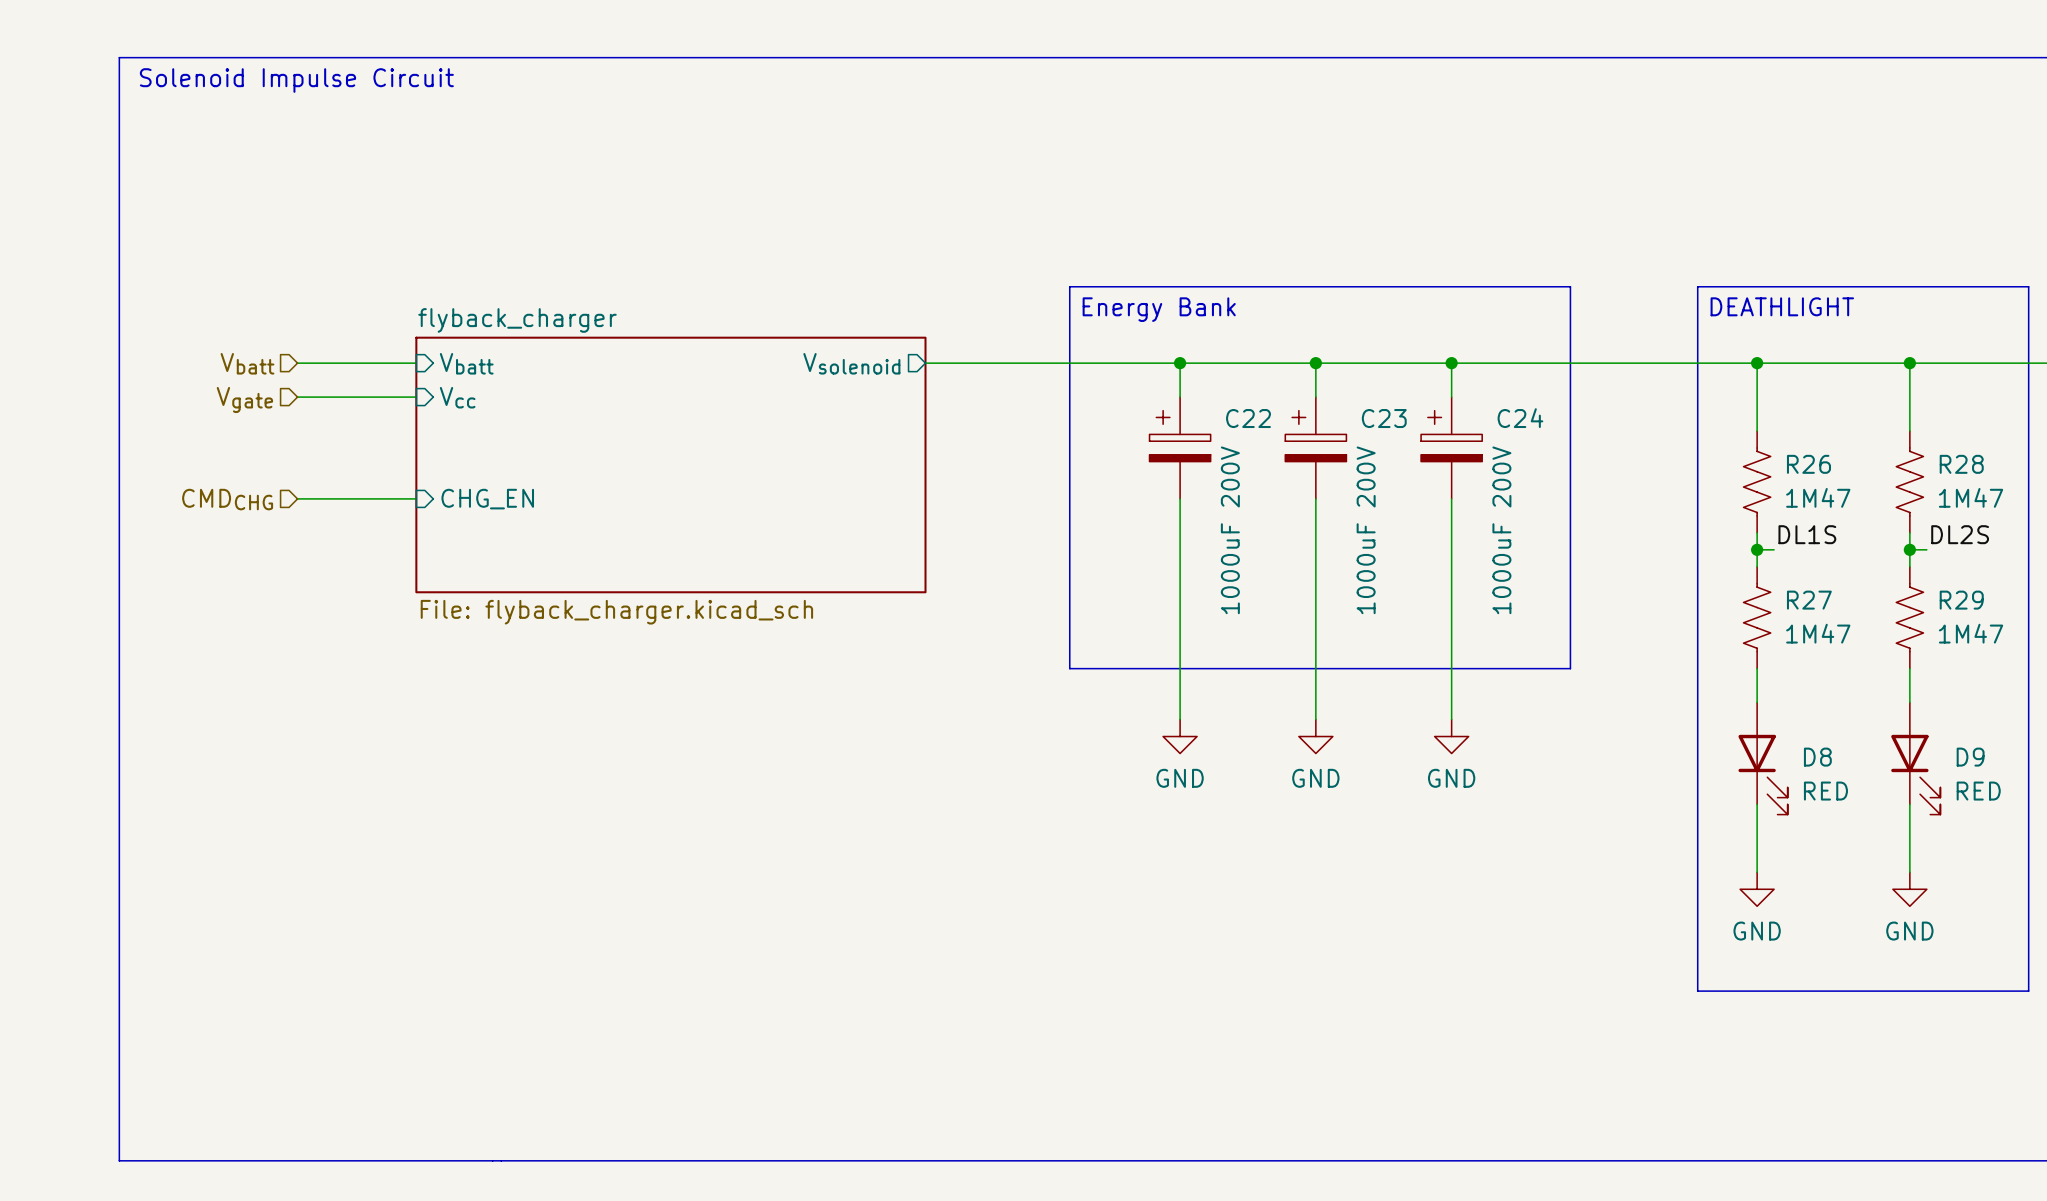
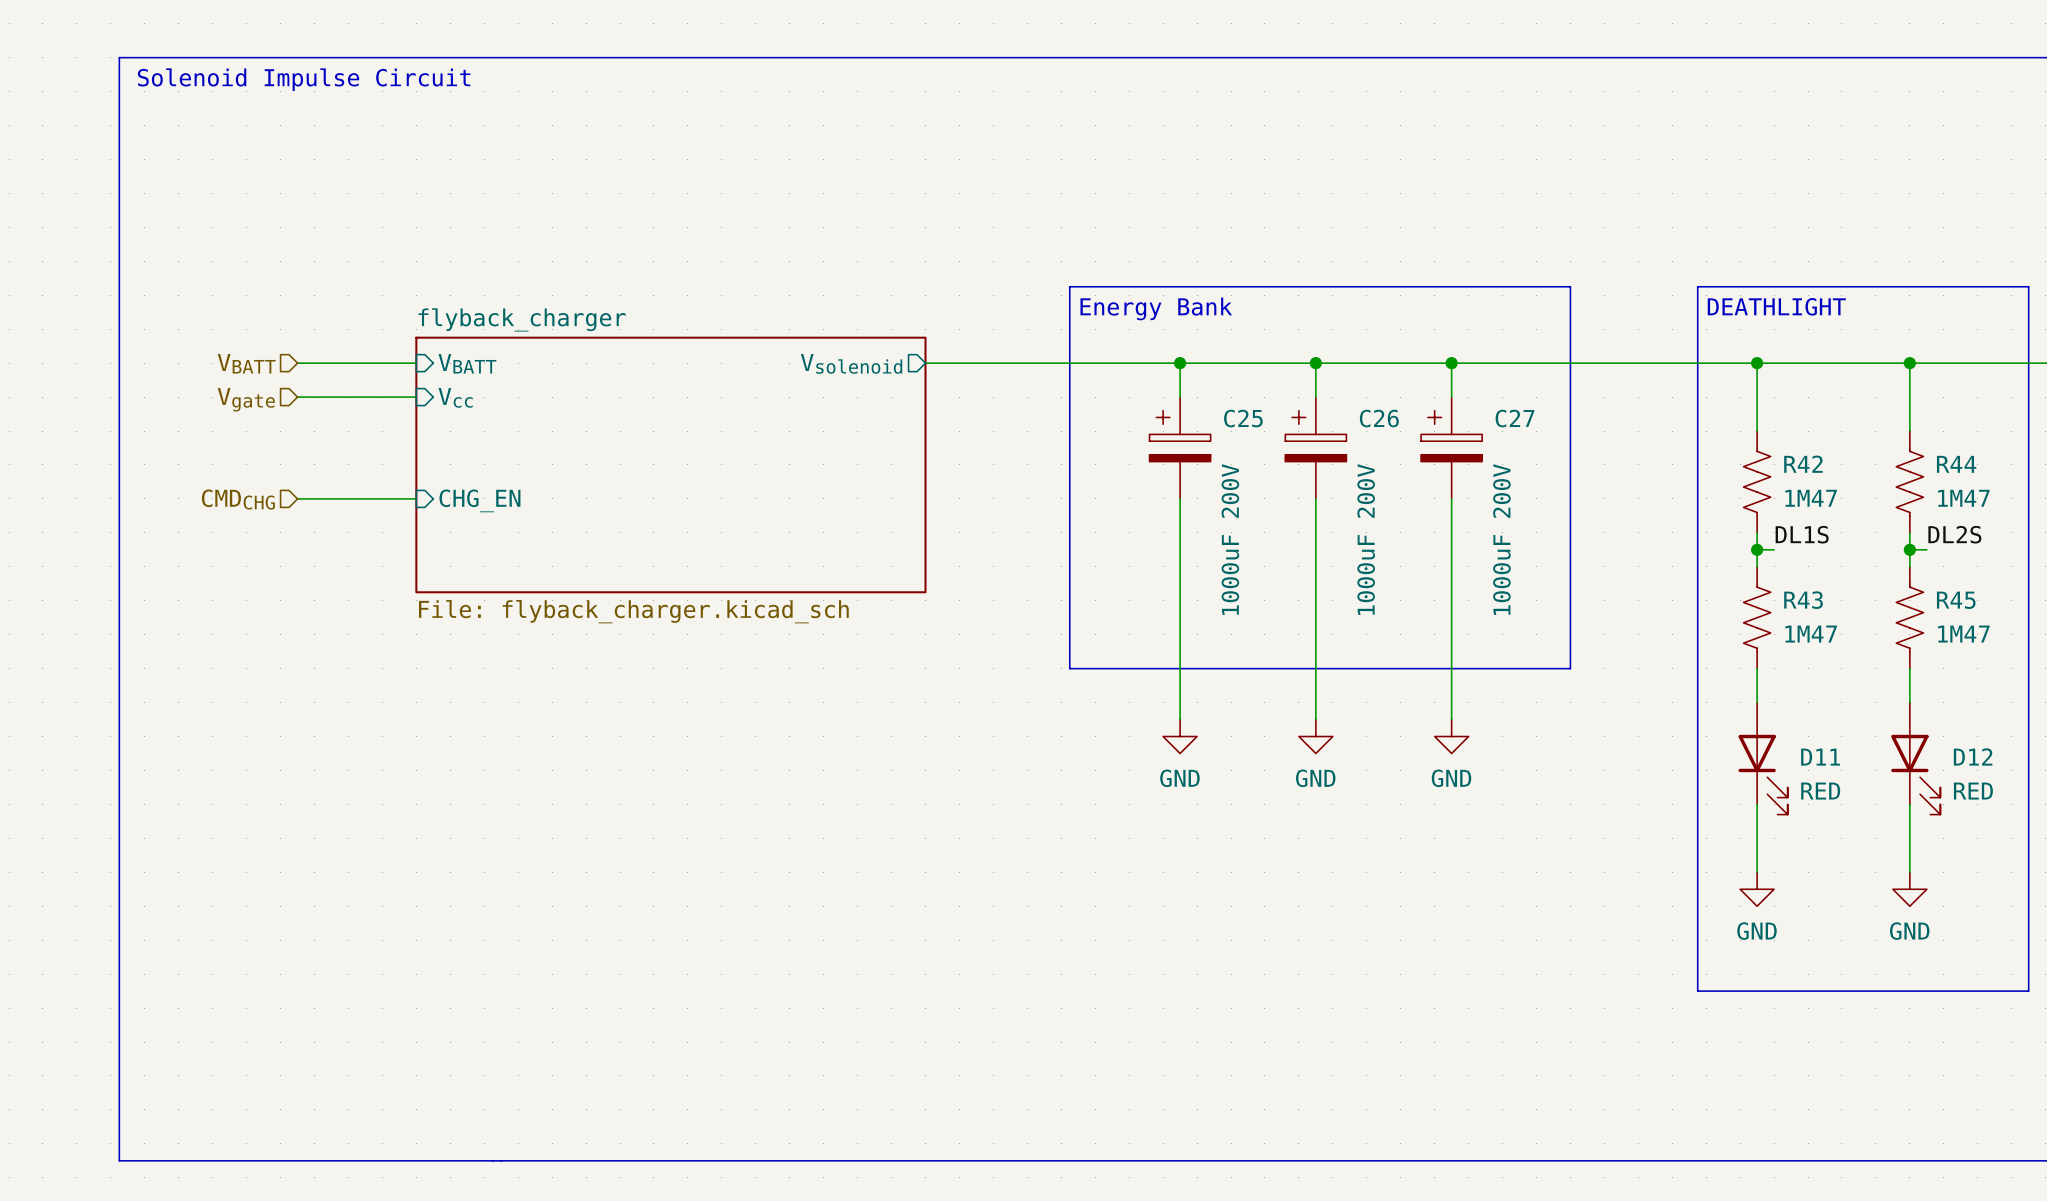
hierarchical label: Vbatt (247, 363) -> VBATT (246, 363)
sheet pin: Vbatt (466, 363) -> VBATT (467, 363)
C22 name: C22 (1248, 418) -> C25 (1243, 418)
C23 name: C23 (1384, 418) -> C26 (1379, 418)
C24 name: C24 (1520, 418) -> C27 (1515, 418)
R26 name: R26 (1808, 464) -> R42 (1803, 464)
R28 name: R28 (1961, 464) -> R44 (1956, 464)
R27 name: R27 (1809, 600) -> R43 (1803, 600)
R29 name: R29 (1961, 600) -> R45 (1956, 600)
D8 name: D8 (1817, 757) -> D11 (1820, 757)
D9 name: D9 (1970, 757) -> D12 (1973, 756)

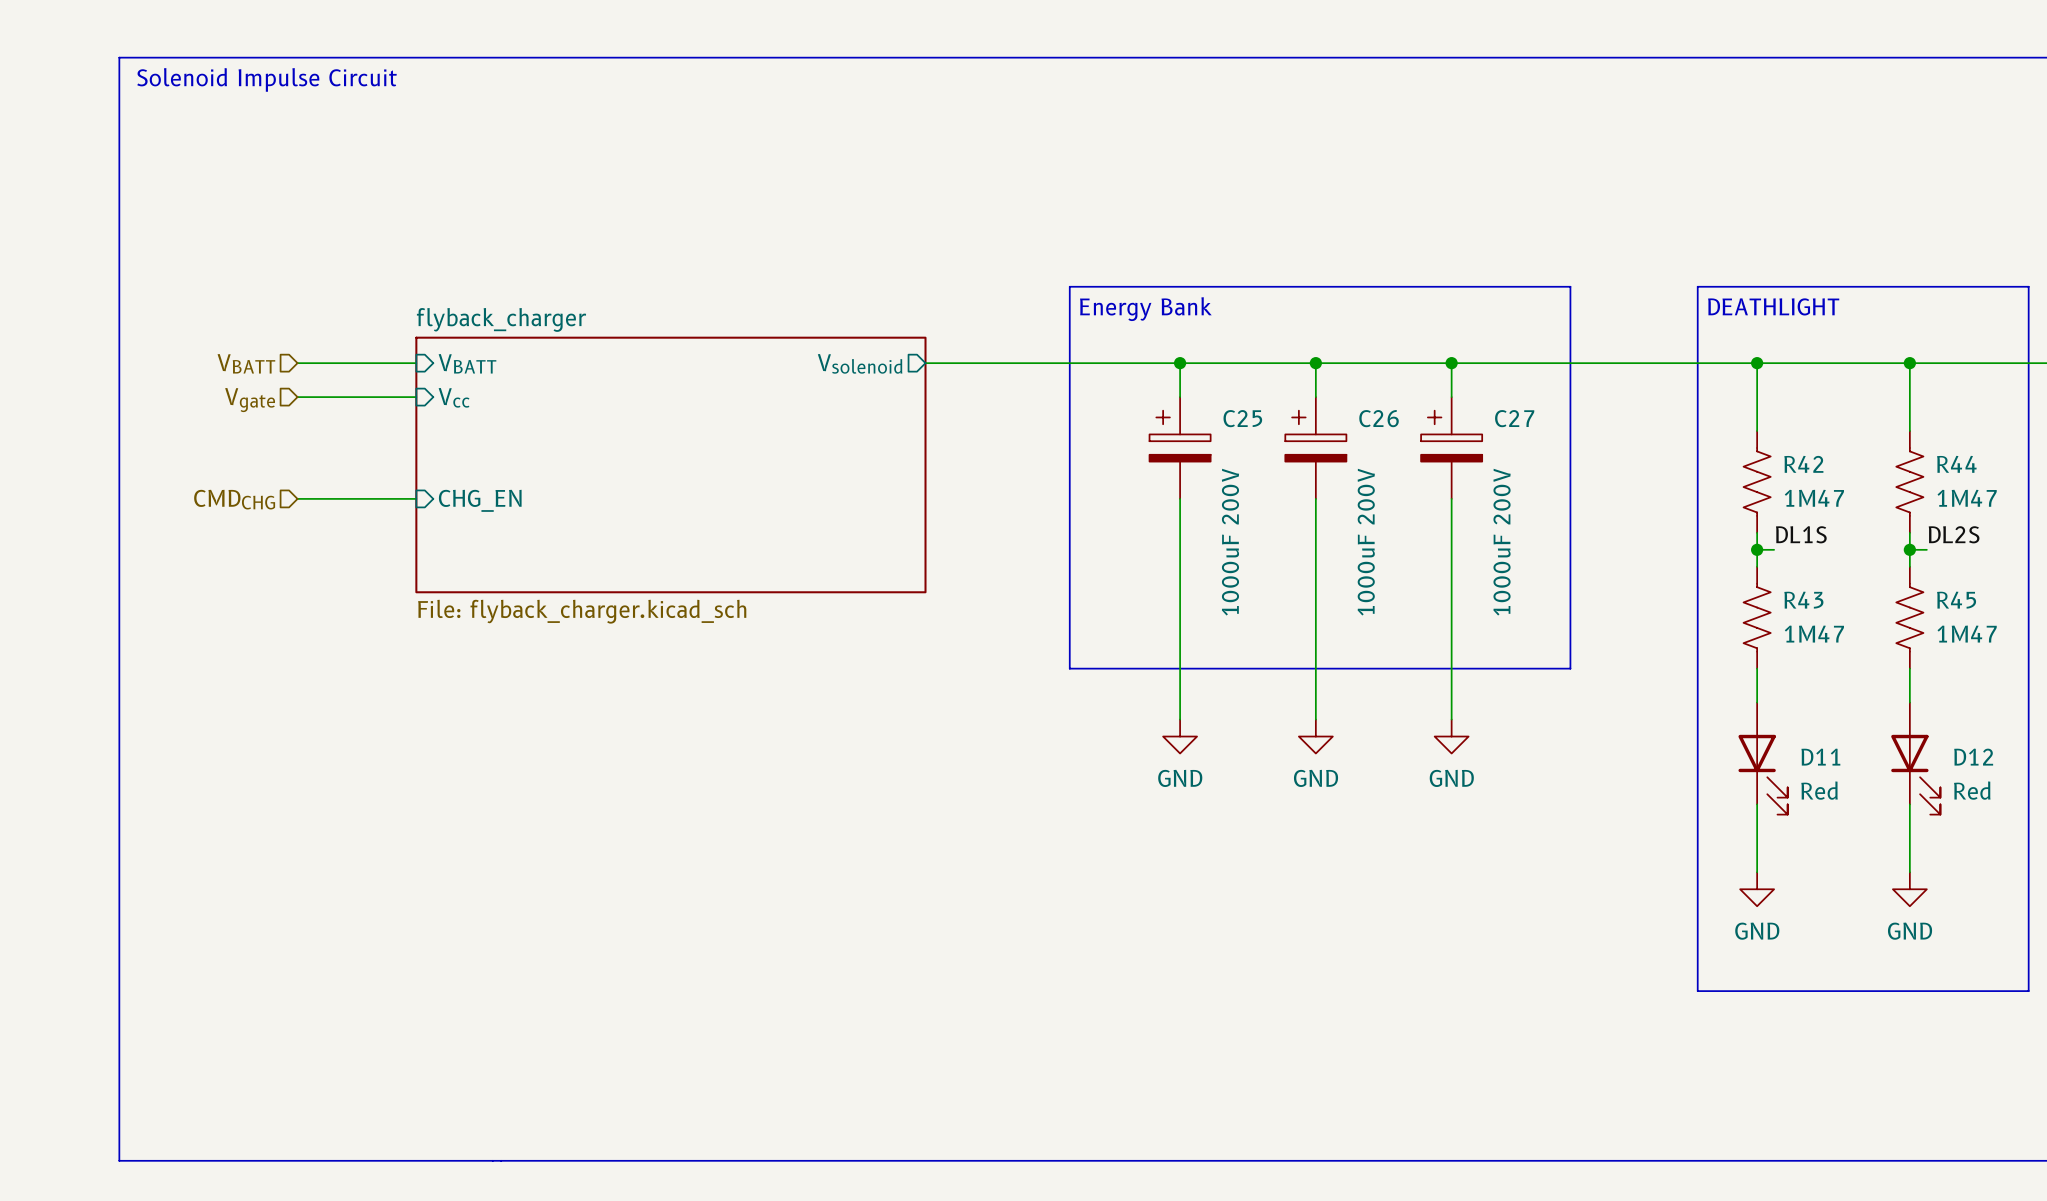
D11 value: RED (1820, 791) -> Red (1819, 790)
D12 value: RED (1973, 791) -> Red (1972, 790)

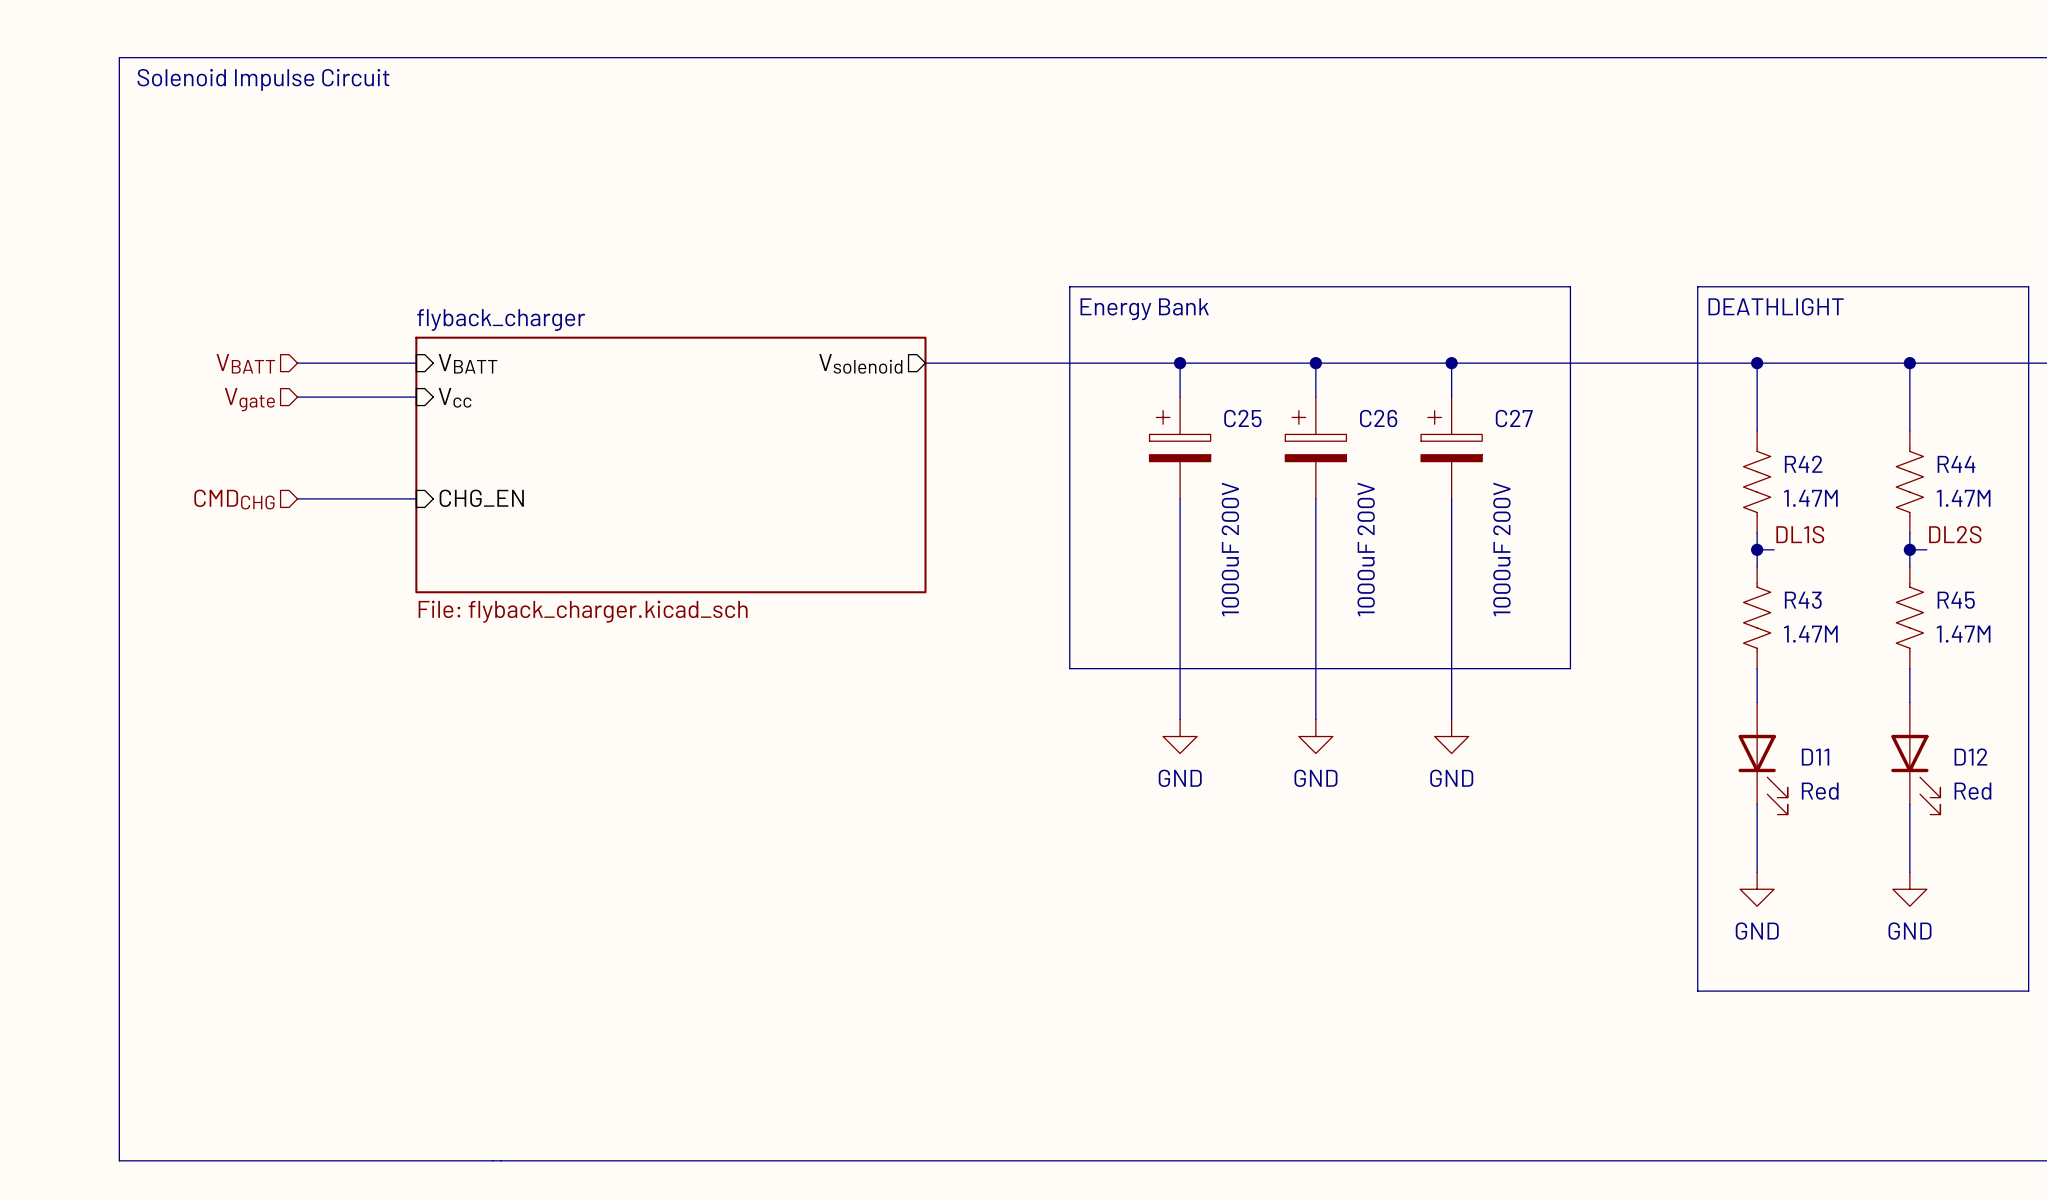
R42 value: 1M47 (1814, 498) -> 1.47M (1810, 498)
R44 value: 1M47 (1967, 498) -> 1.47M (1963, 498)
R43 value: 1M47 (1814, 634) -> 1.47M (1810, 634)
R45 value: 1M47 (1967, 634) -> 1.47M (1963, 634)

